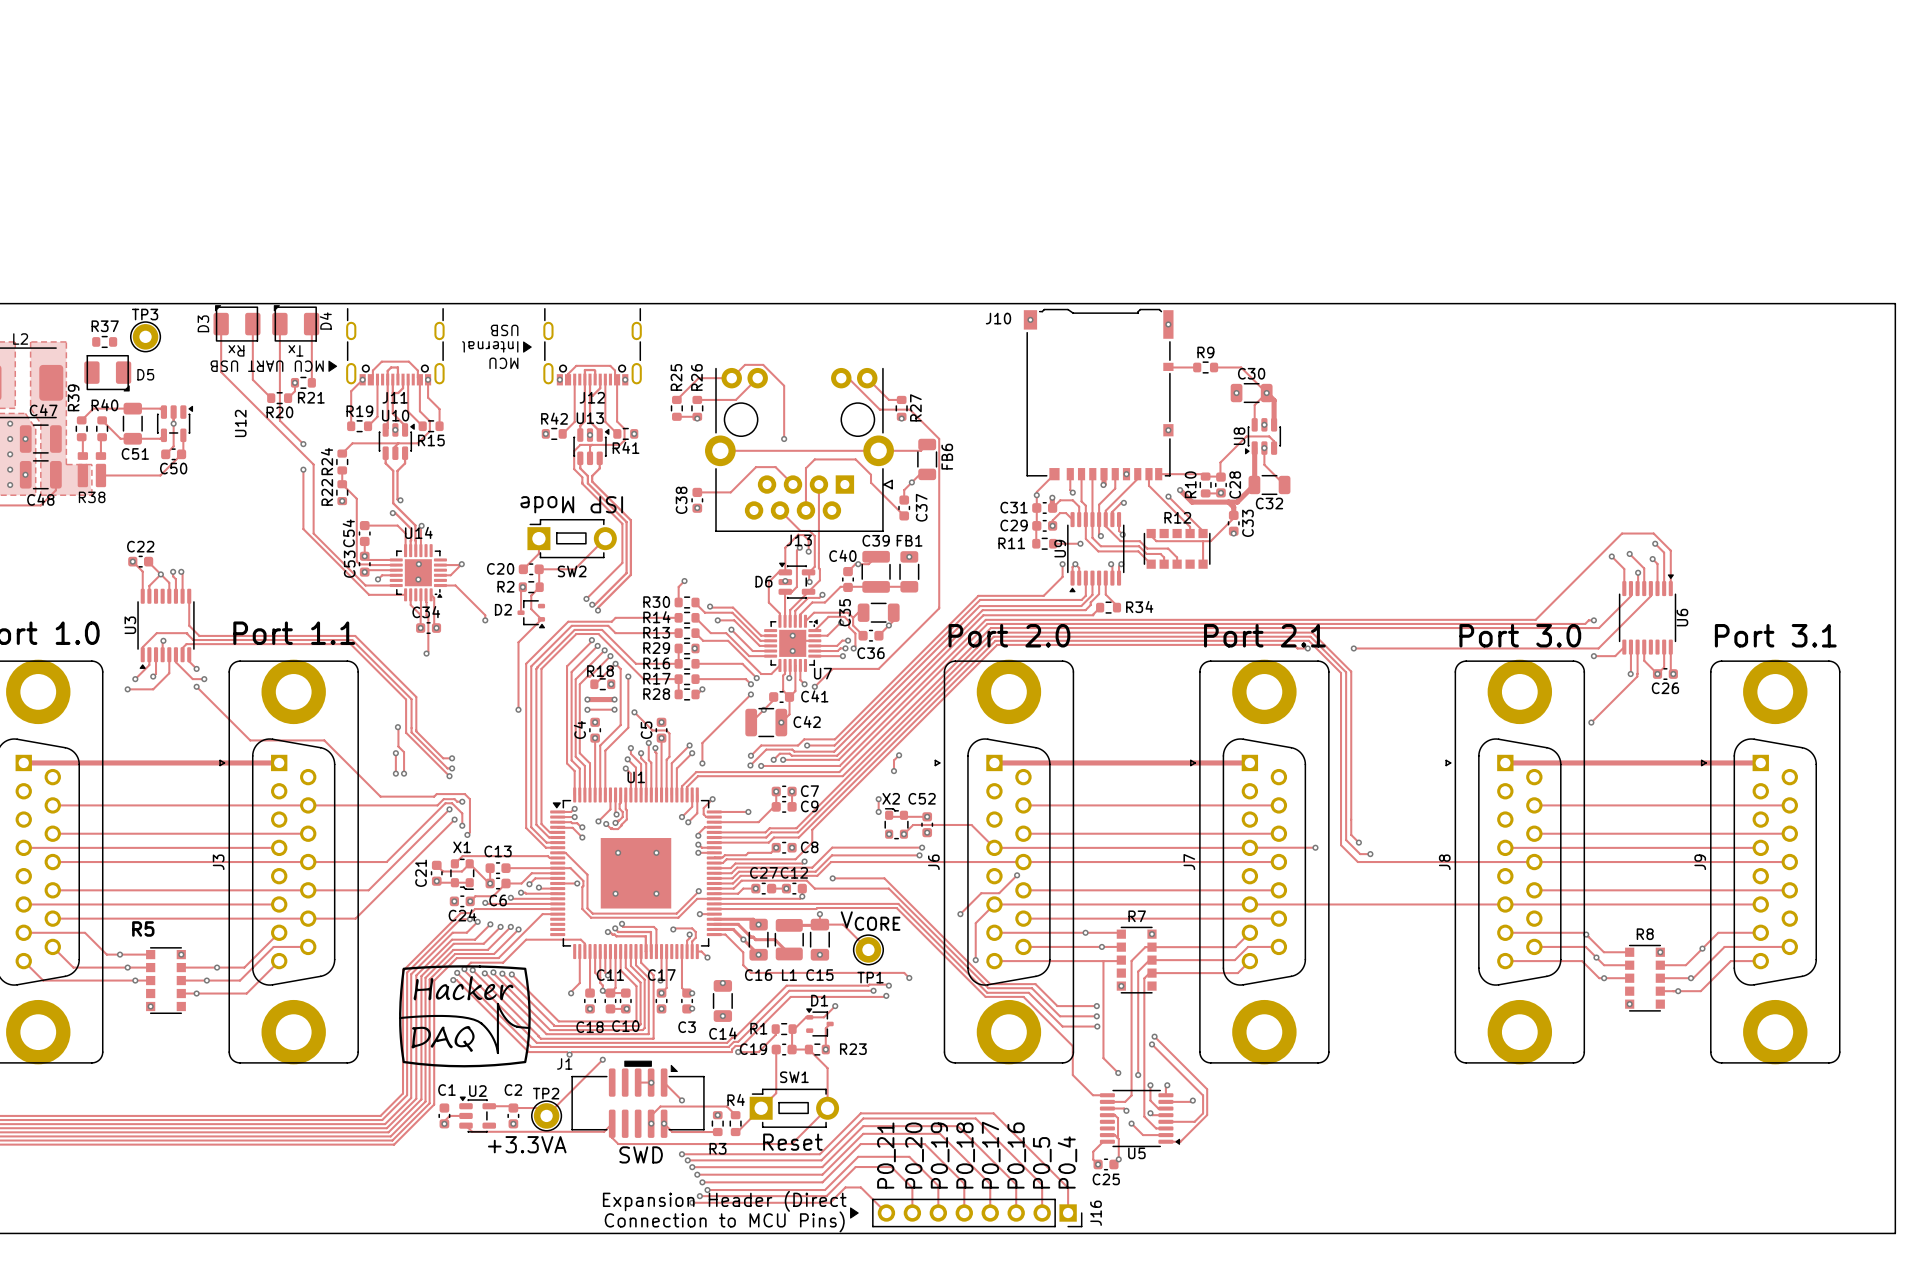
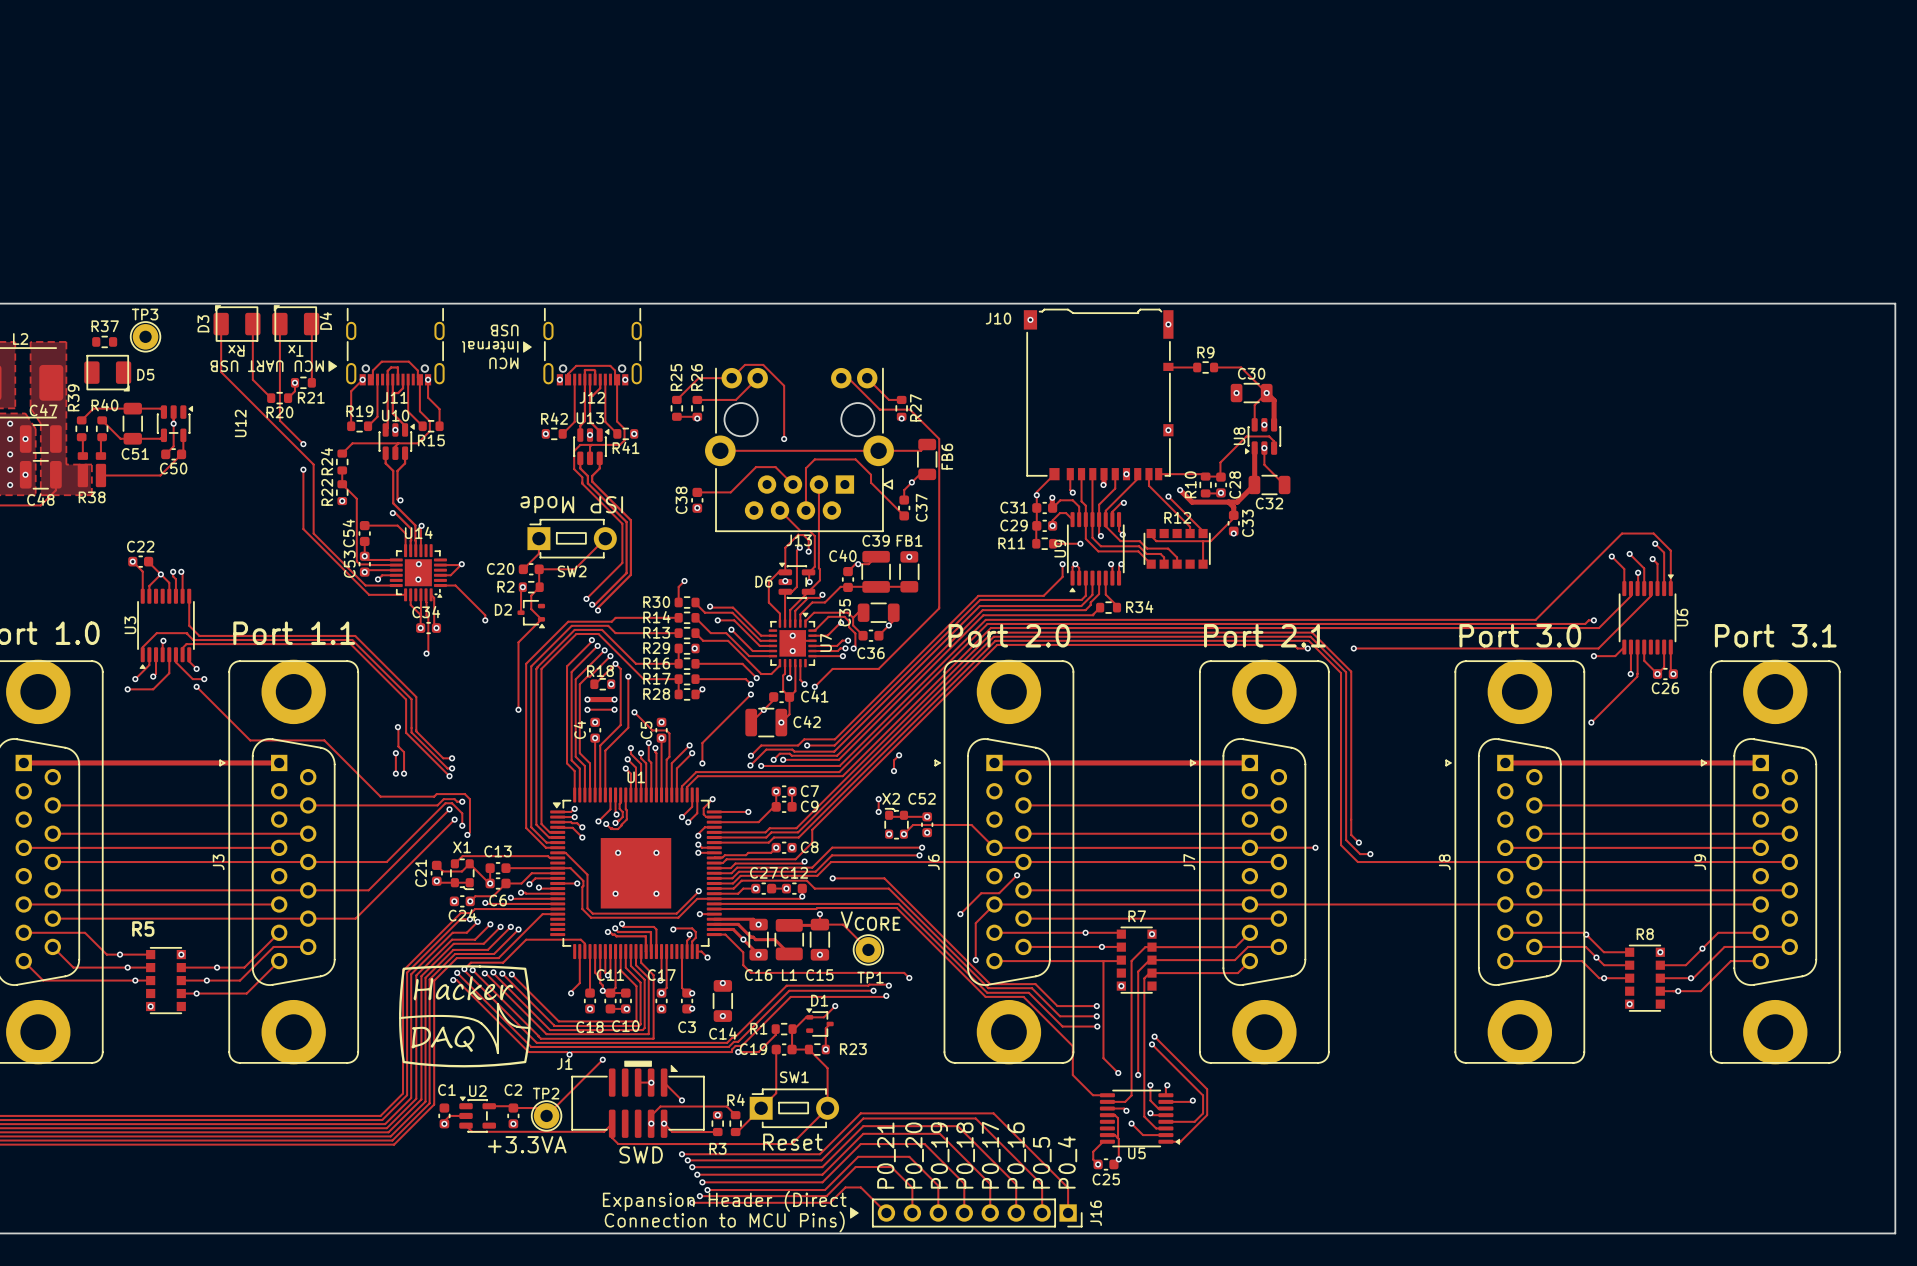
U7 footprint: [764, 614, 822, 672] -> [768, 612, 817, 668]
U7 name position: U7 (822, 673) -> U7 (826, 642)

